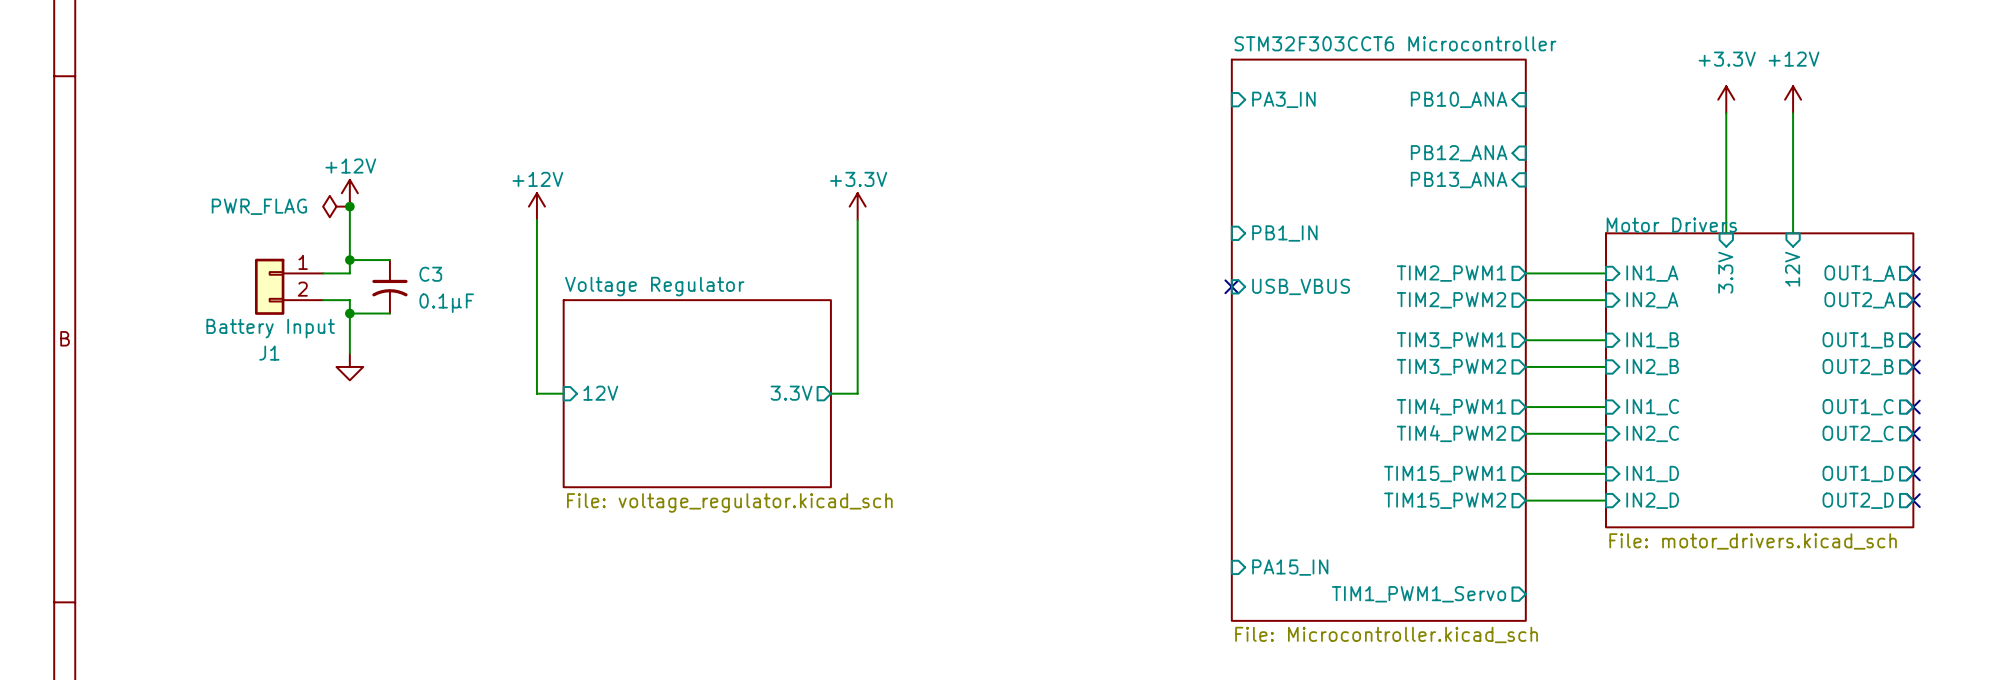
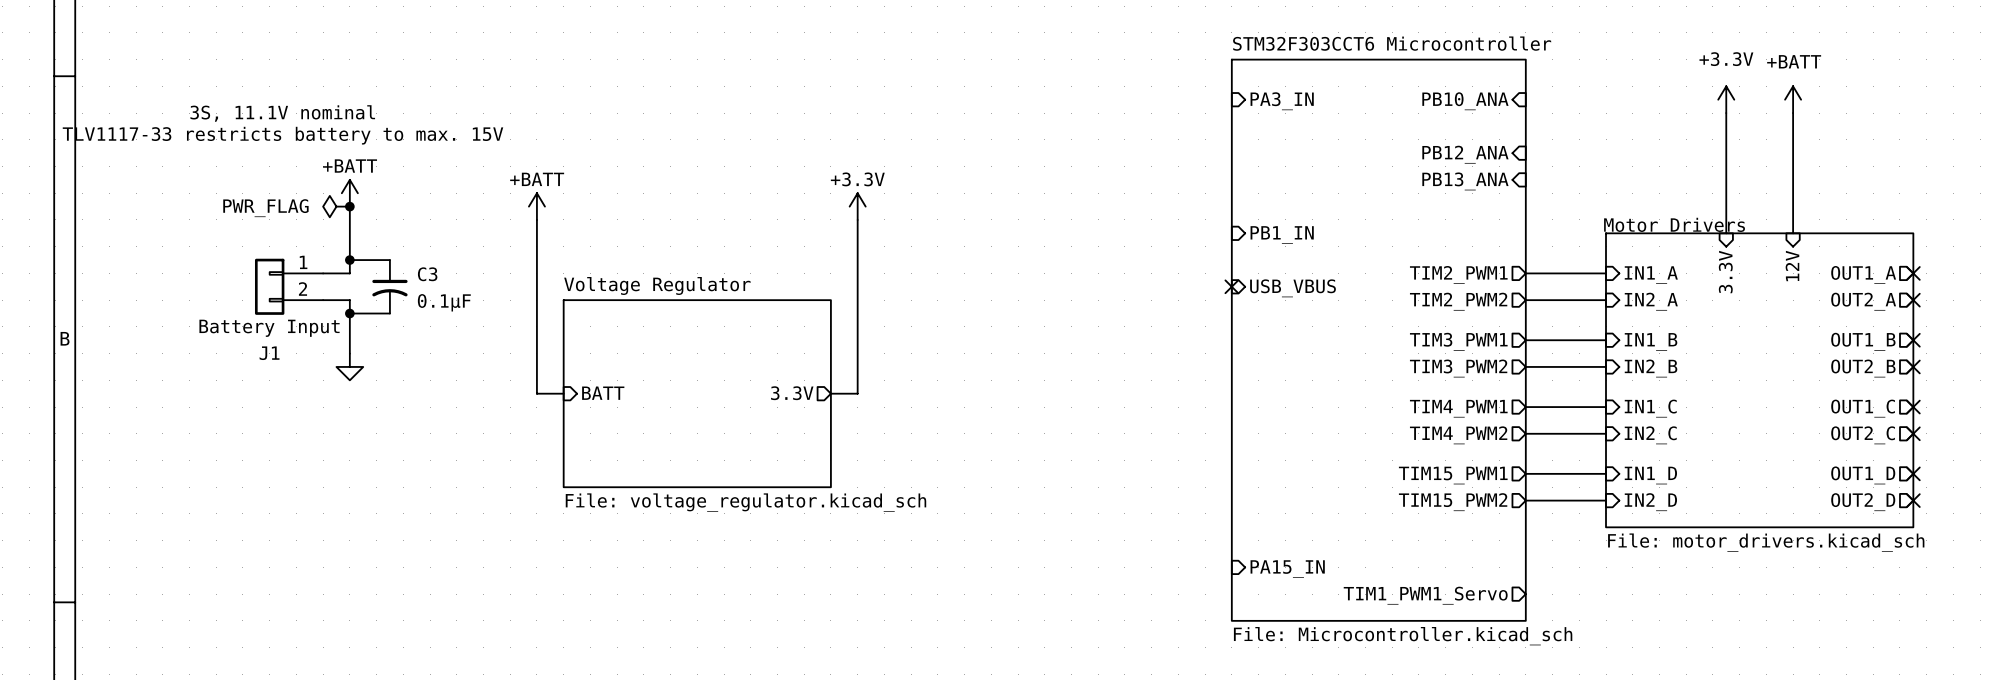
power symbol: +12V (1793, 99) -> +BATT (1793, 99)
text: none -> 3S, 11.1V nominal (282, 113)
text: none -> TLV1117-33 restricts battery to max. 15V (283, 135)
power symbol: +12V (349, 193) -> +BATT (349, 193)
power symbol: +12V (536, 206) -> +BATT (536, 206)
sheet pin: 12V (600, 393) -> BATT (603, 393)

